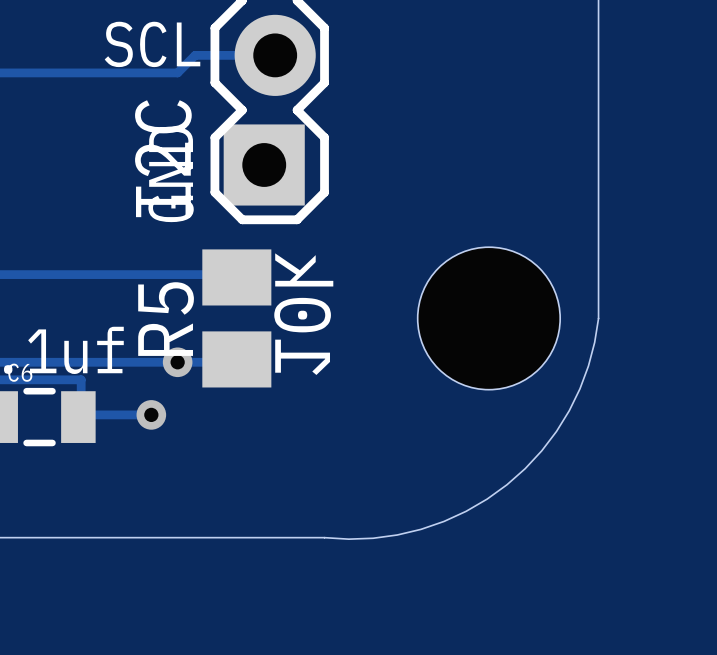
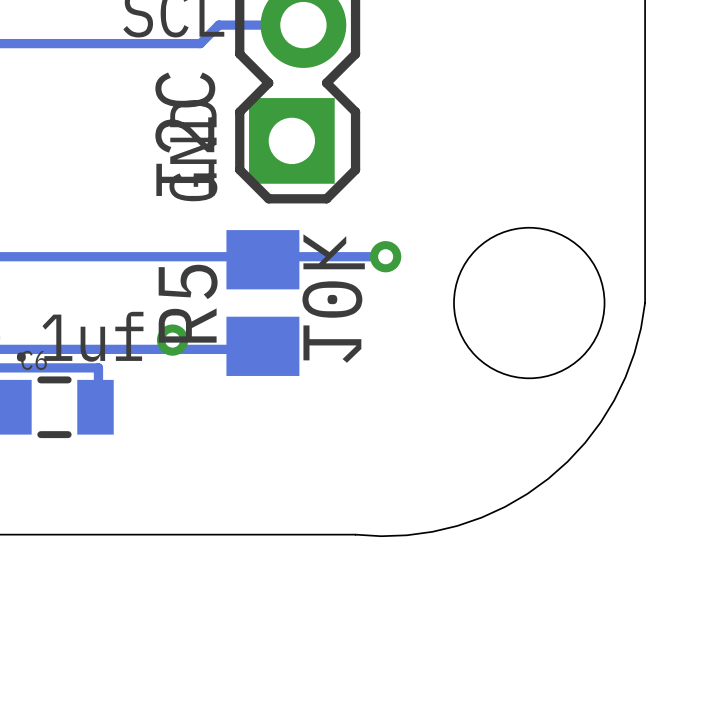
track: none -> (385, 256) (265, 256) (262, 259)
via: none -> (385, 256)
via position: (177, 362) -> (172, 340)
track: (151, 414) (81, 414) -> none
via: (151, 414) -> none

